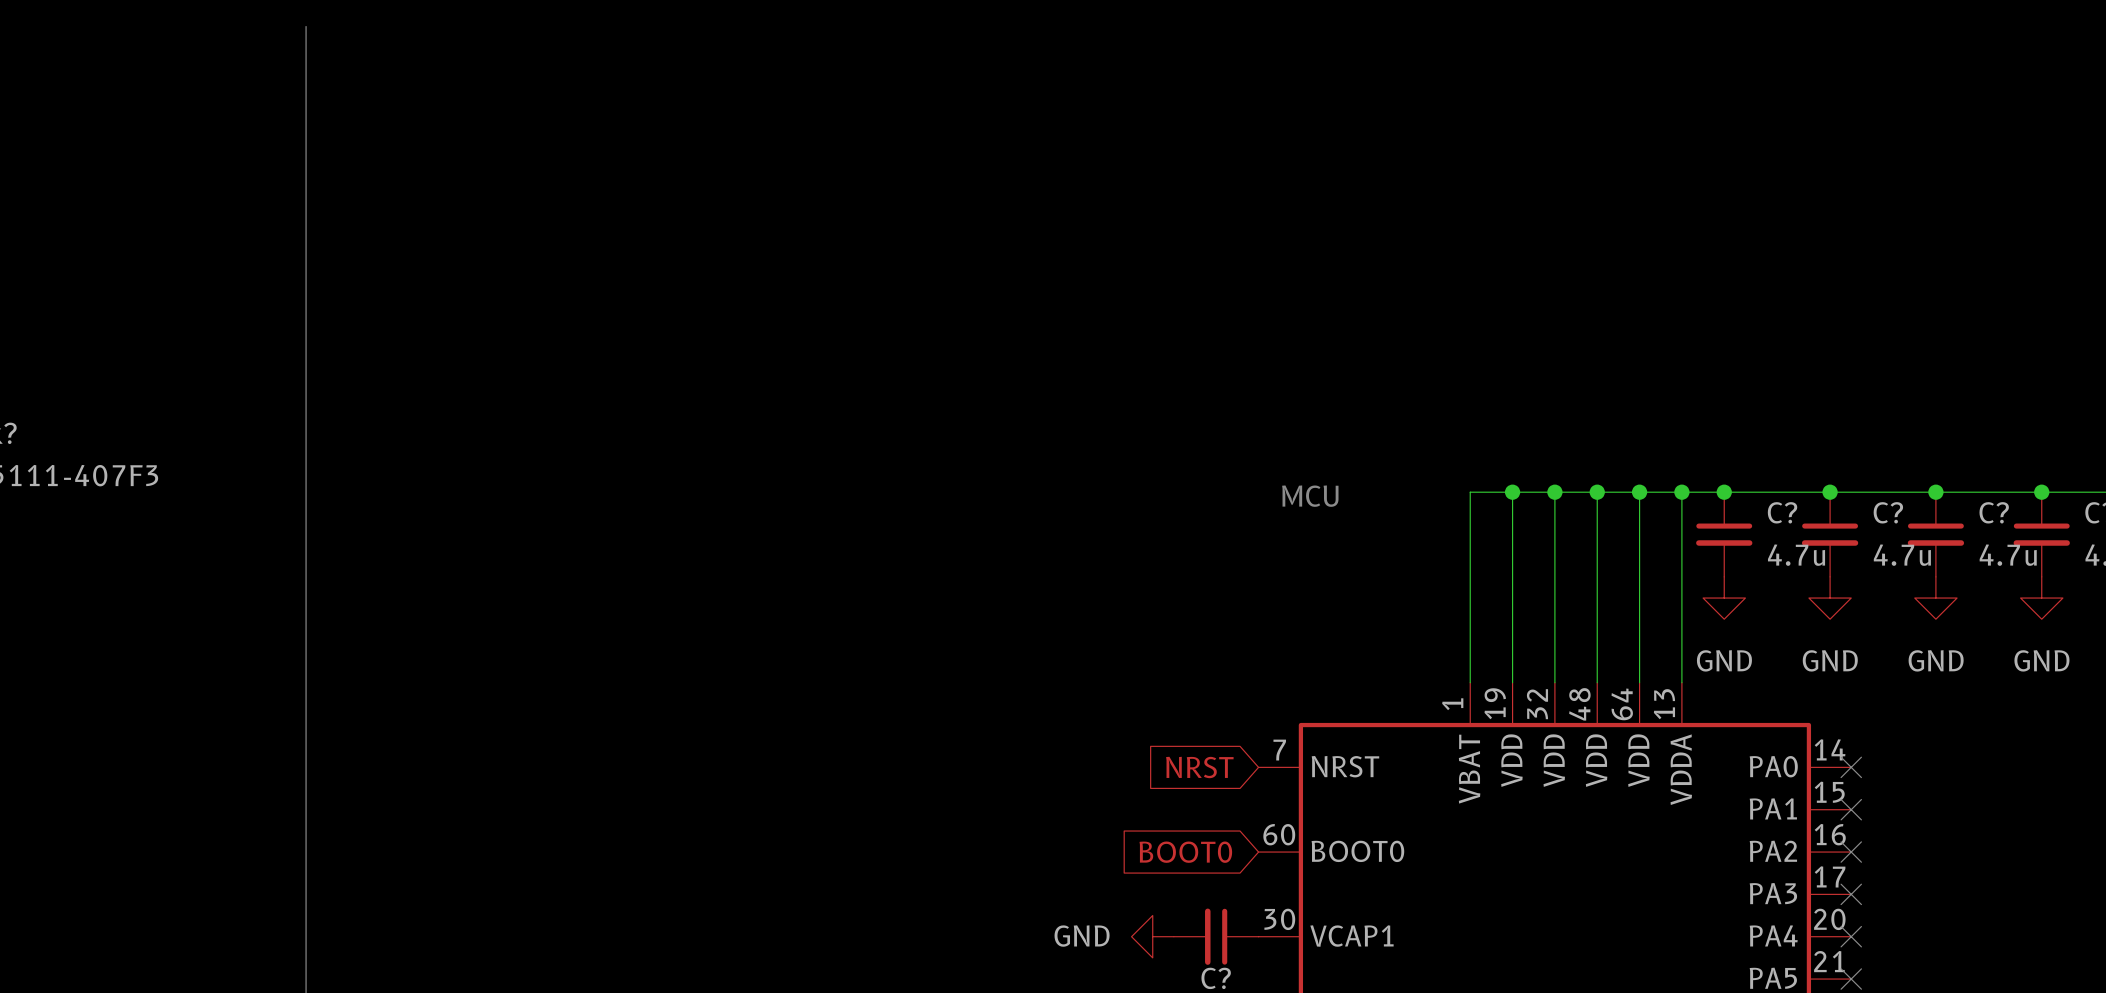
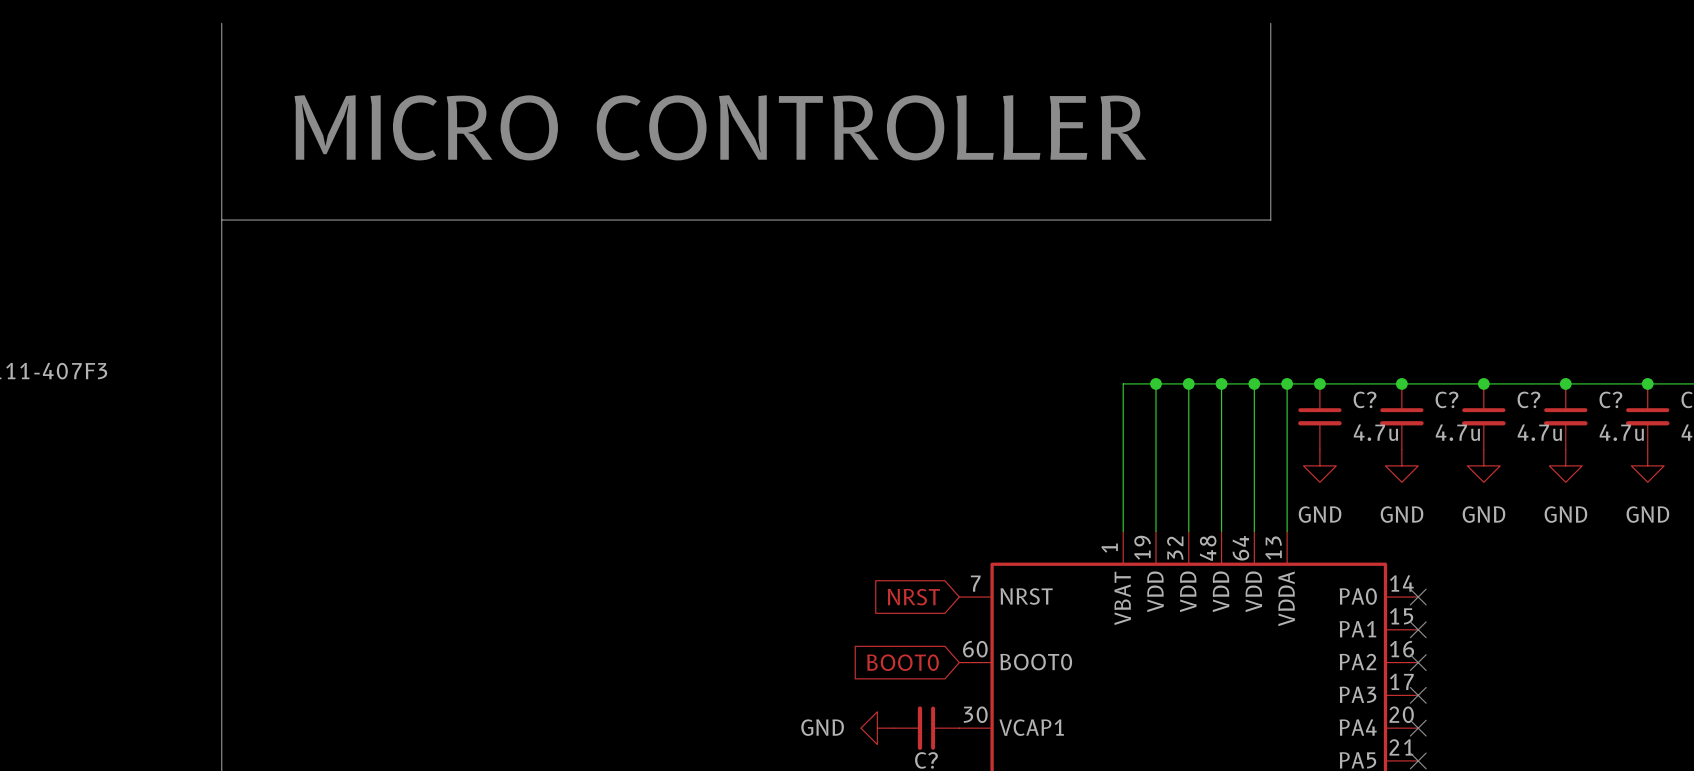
line: none -> (1270, 23) (1270, 220) (221, 220)
text: none -> MICRO CONTROLLER (720, 127)
text: MCU (1310, 496) -> none

